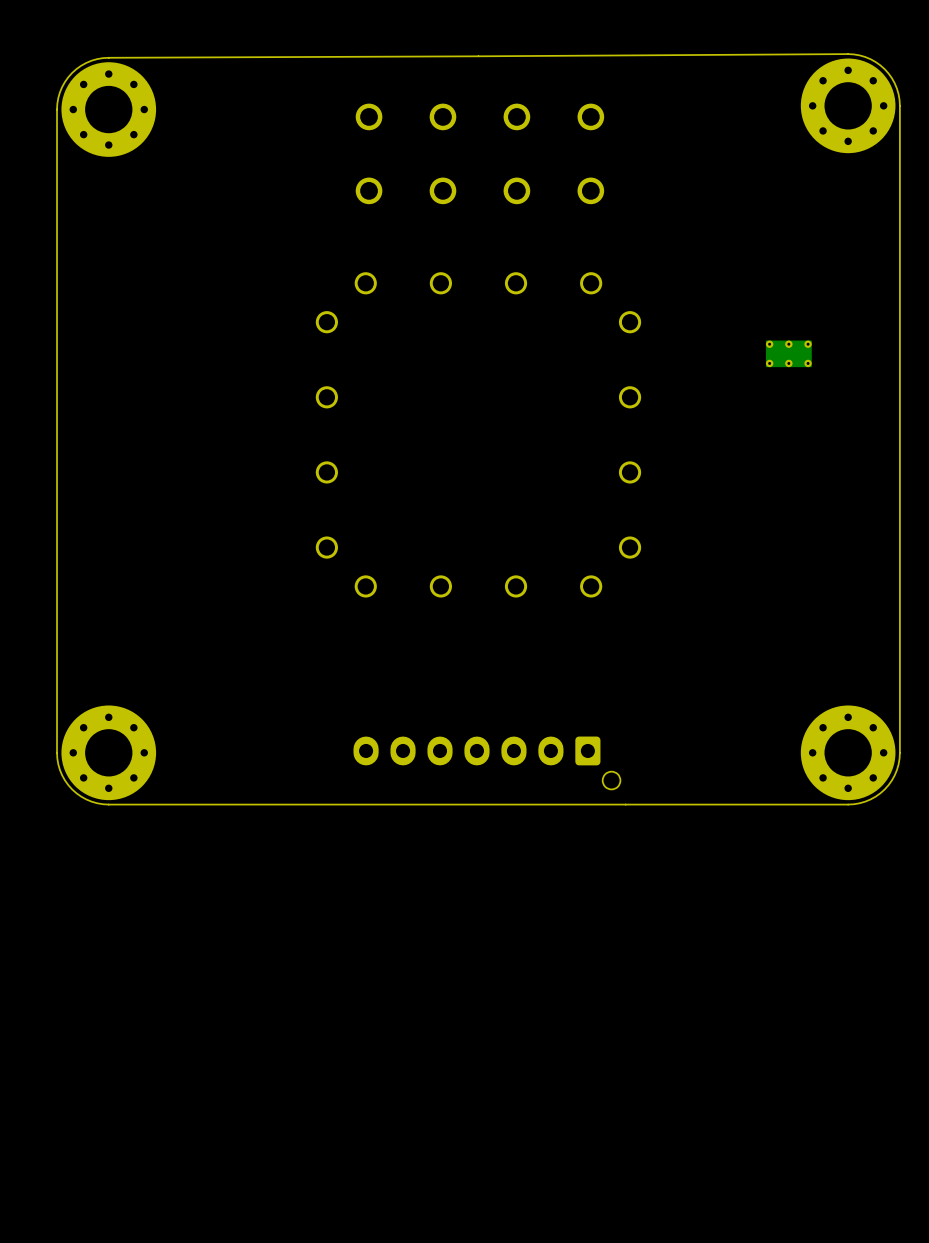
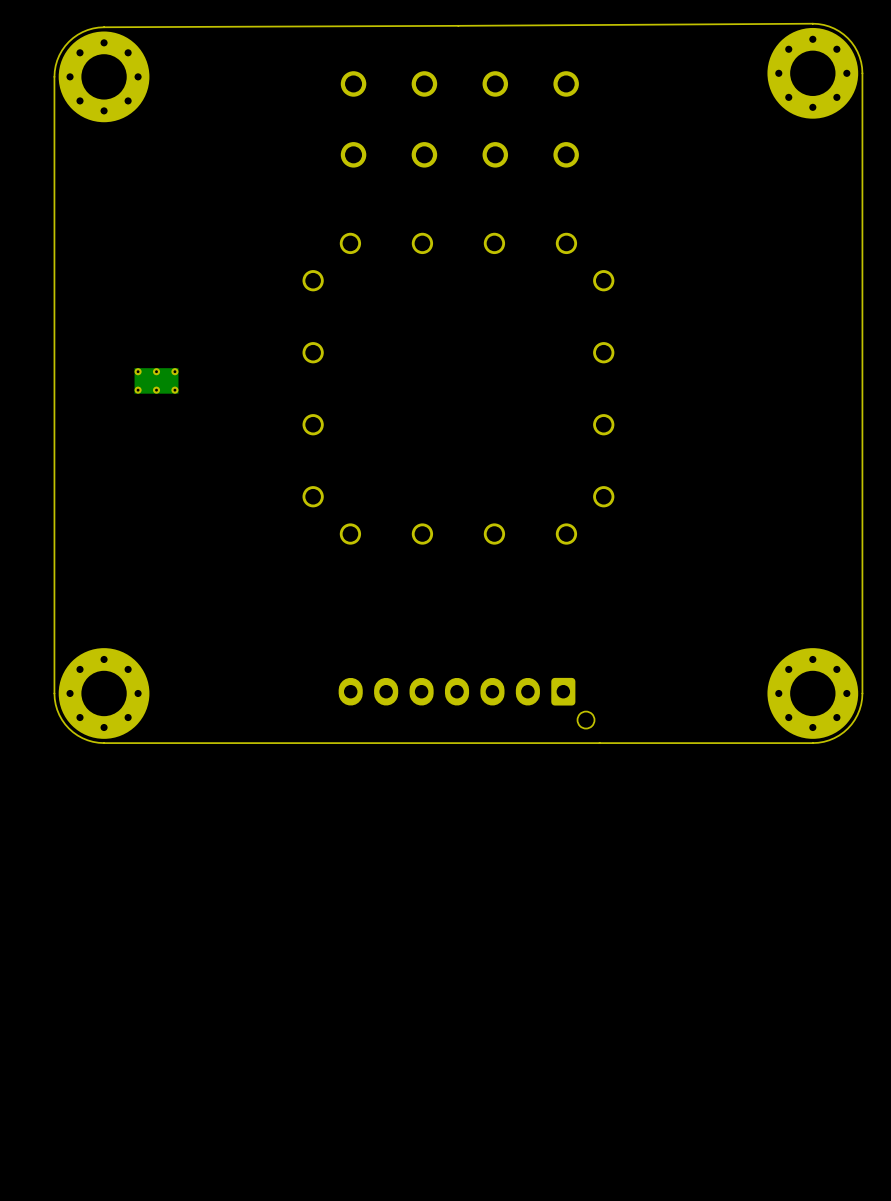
part: (788, 353) -> none
part: none -> (156, 380)

